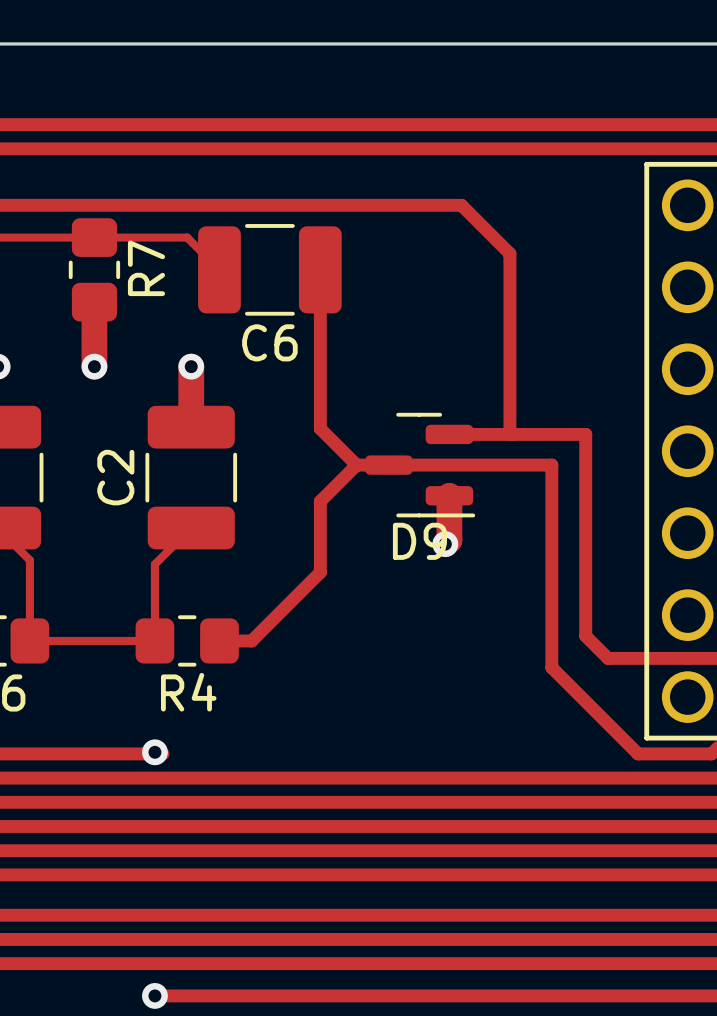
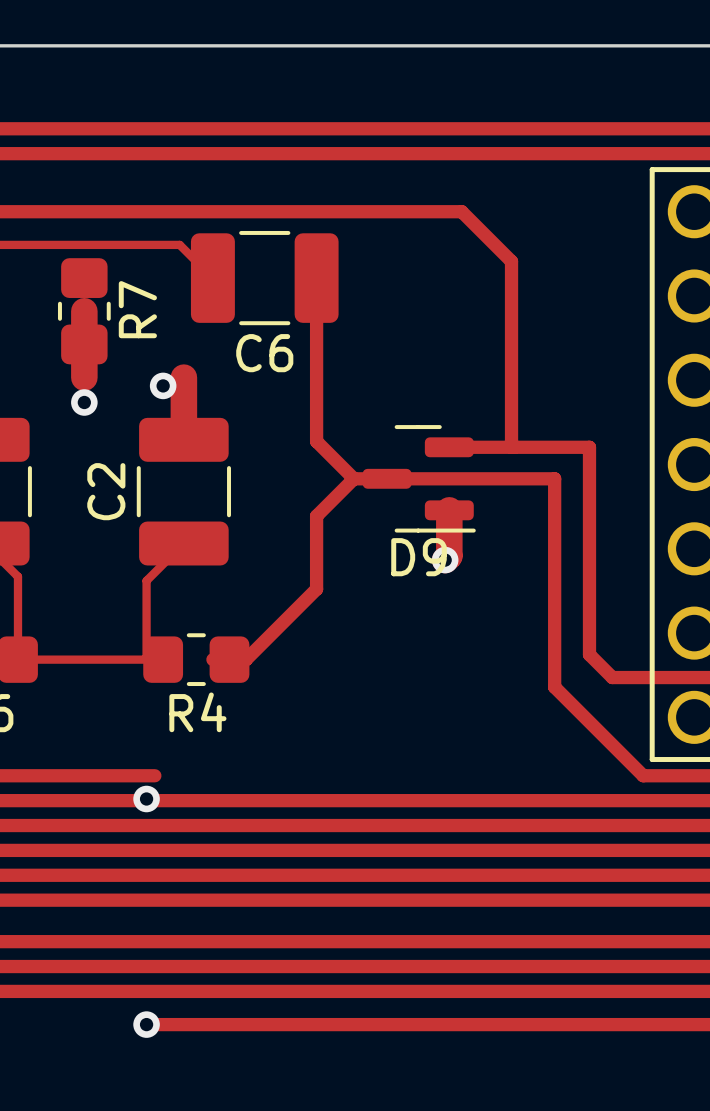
R7 position: (94, 269) -> (84, 311)
via position: (94, 366) -> (84, 402)
via position: (191, 366) -> (163, 385)
R4 position: (187, 640) -> (196, 659)
via position: (154, 752) -> (146, 799)

